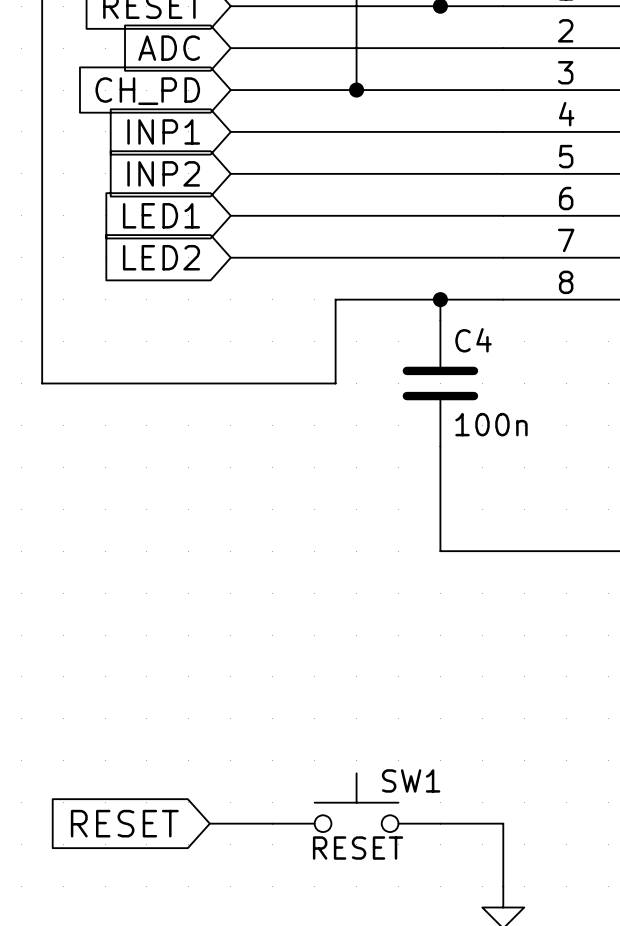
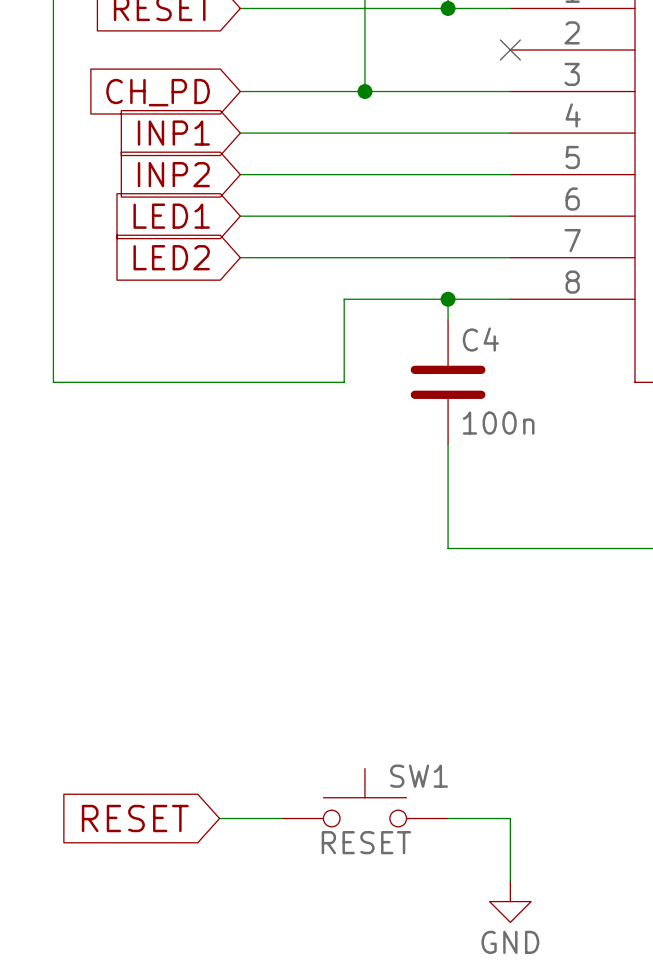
global label: ADC (169, 48) -> none
wire: (230, 48) (503, 48) -> none
no-connect mark: none -> (510, 50)

